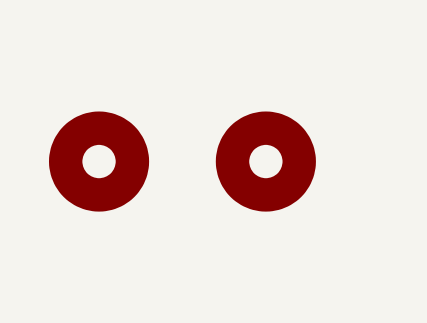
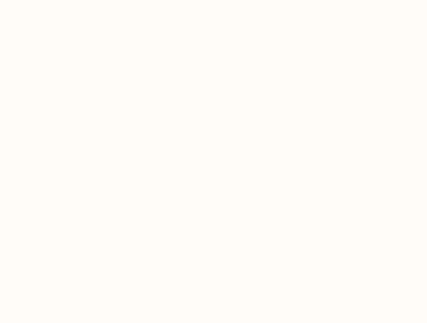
part: (99, 161) -> none
part: (265, 161) -> none

